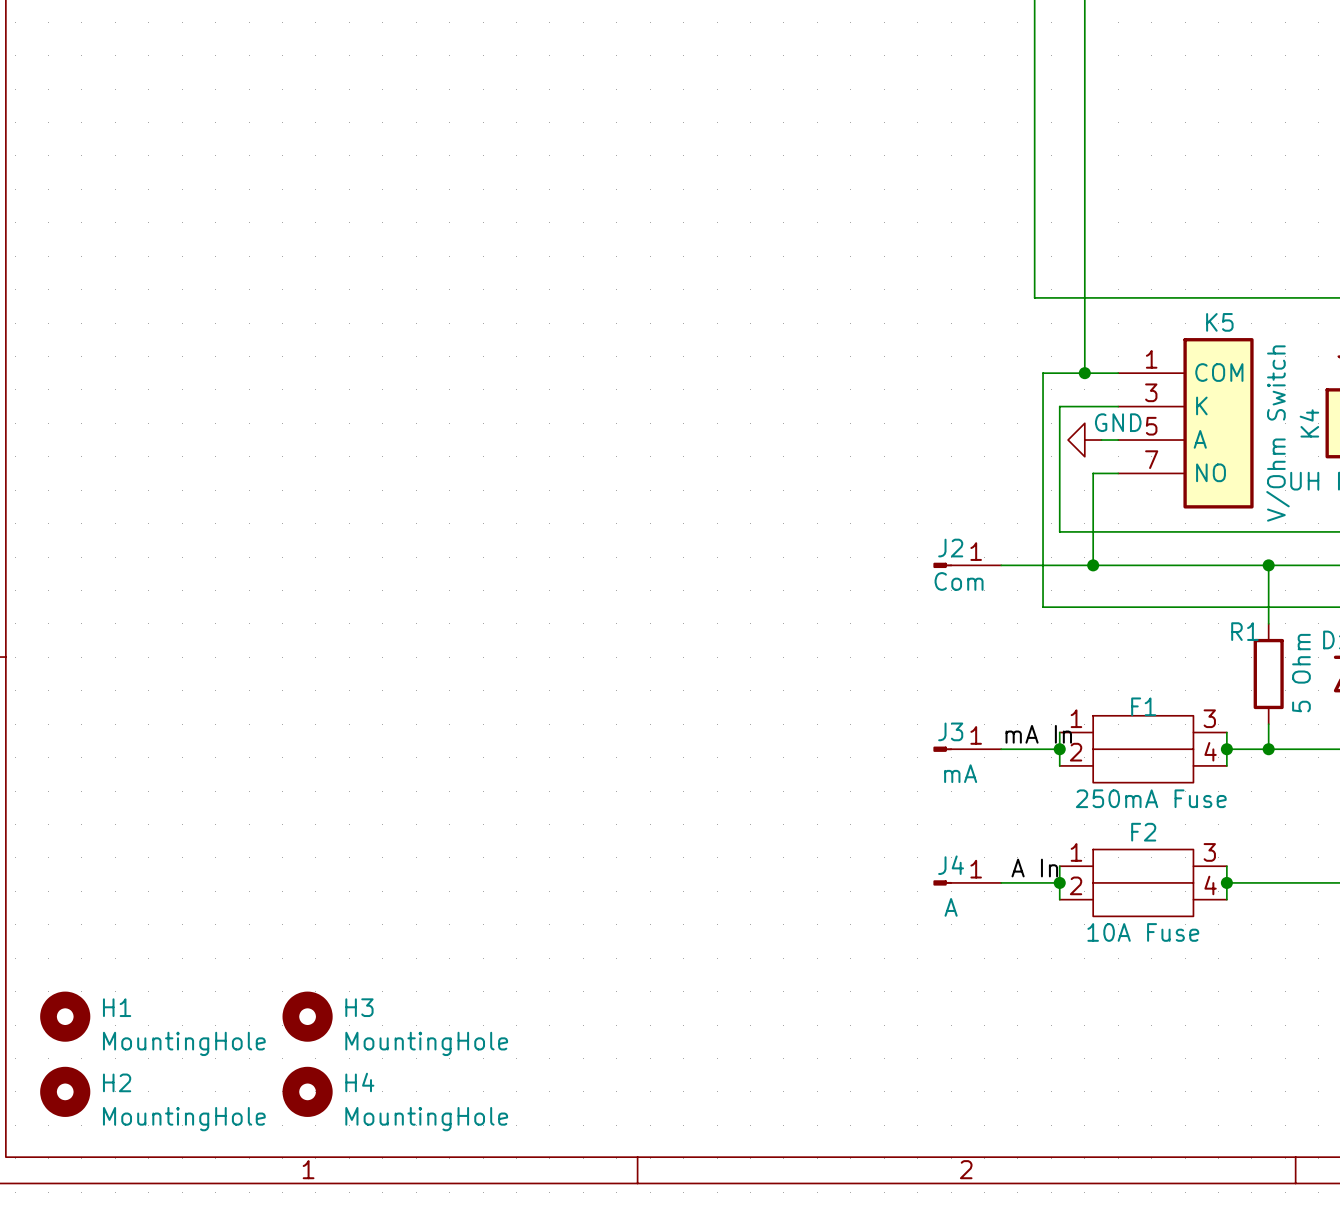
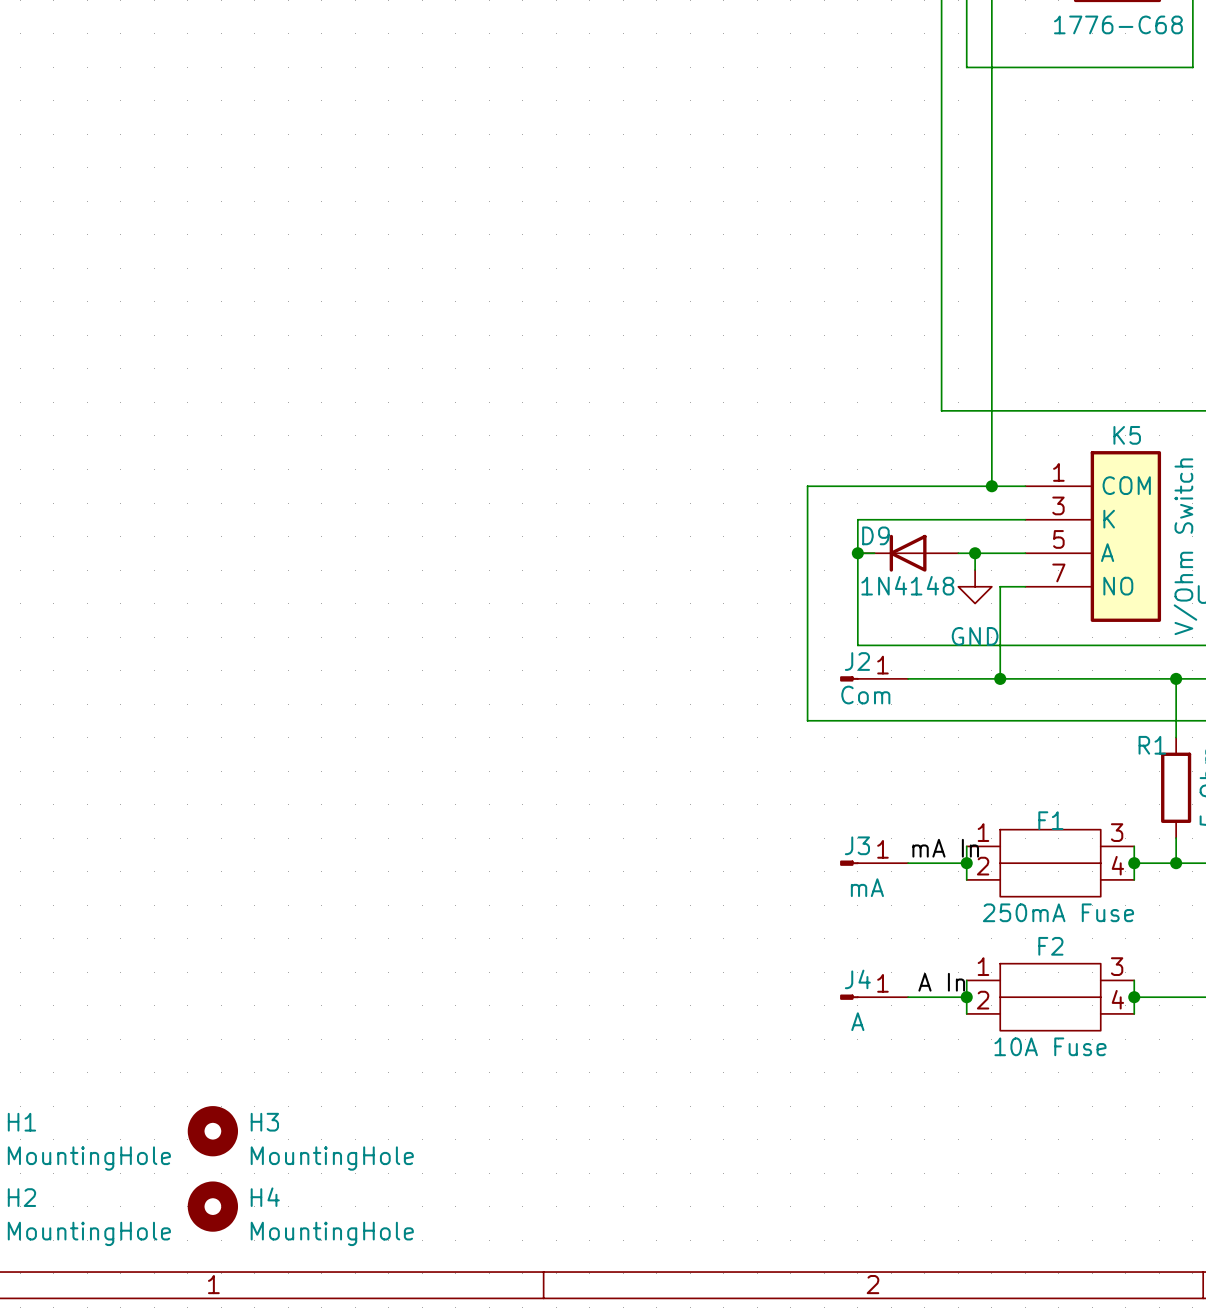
wire: (1043, 373) (1043, 607) -> (949, 486) (807, 486) (807, 720) (949, 720)
wire: (1059, 406) (1059, 531) -> (966, 519) (857, 519) (857, 645) (966, 645)
power symbol text position: GND (1118, 422) -> GND (975, 636)
wire: none -> (857, 553) (874, 553)
junction: none -> (857, 553)
D9: none -> 1N4148 (908, 553)
wire: none -> (958, 553) (1008, 553)
wire: none -> (975, 553) (975, 570)
junction: none -> (975, 553)
power symbol rotation: 0° (1084, 440) -> 90° counterclockwise (975, 586)
power symbol position: GND (1084, 440) -> GND (975, 586)

